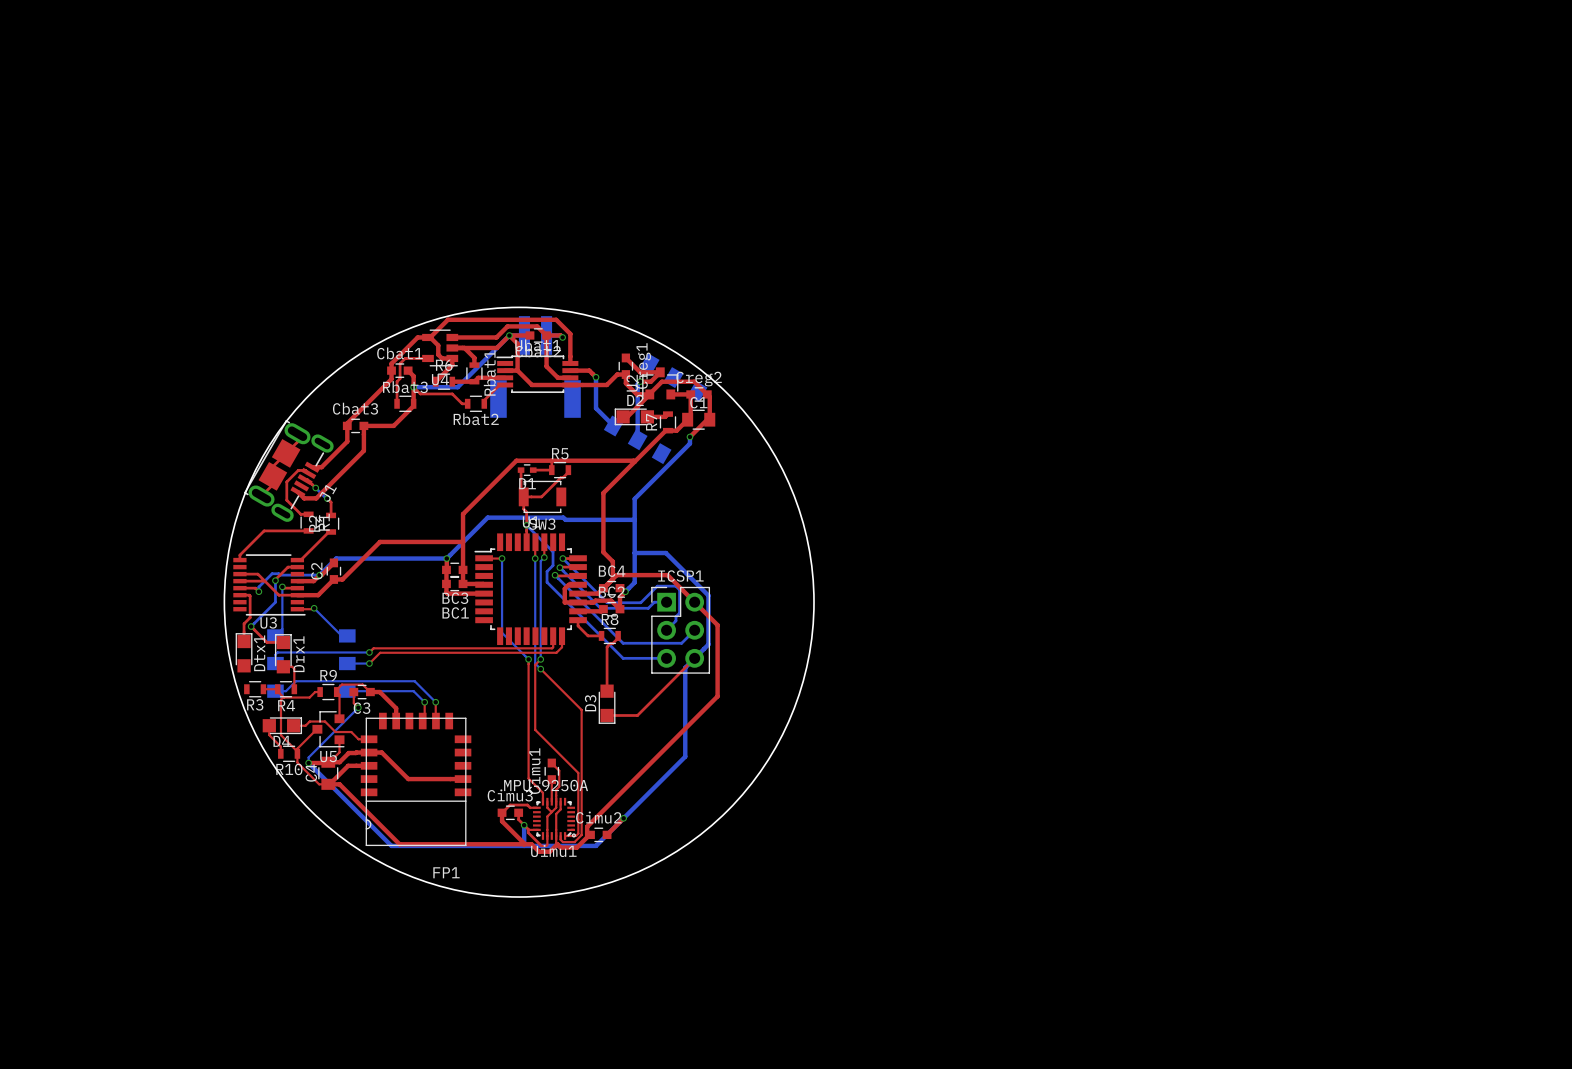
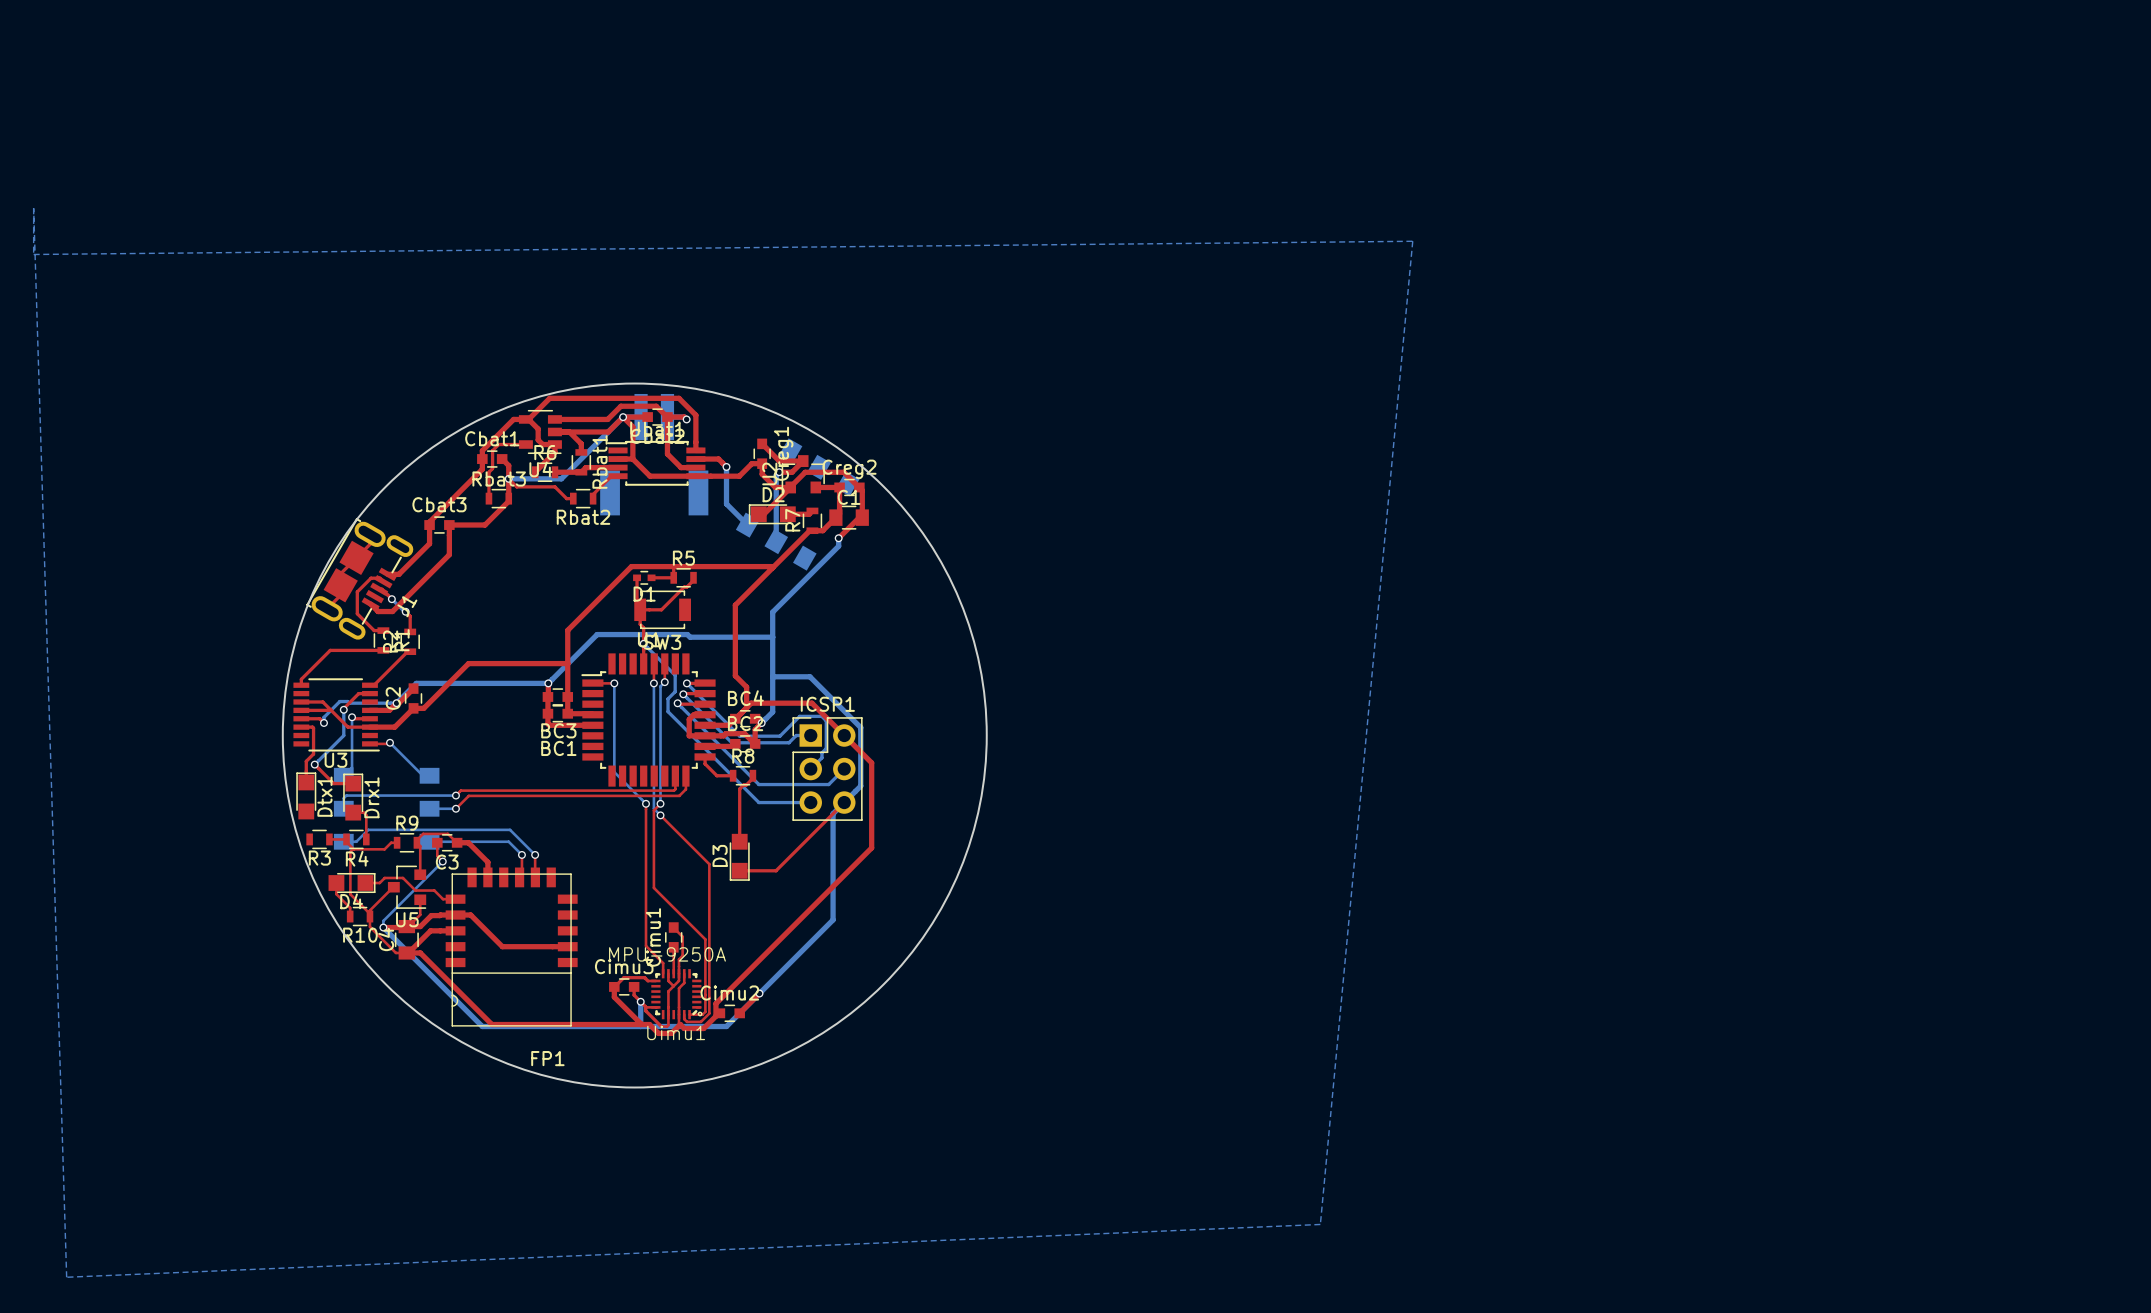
bottom zone outline: none -> (33, 208) (66, 1277) (1320, 1224) (1412, 241) (33, 254) (33, 208)

